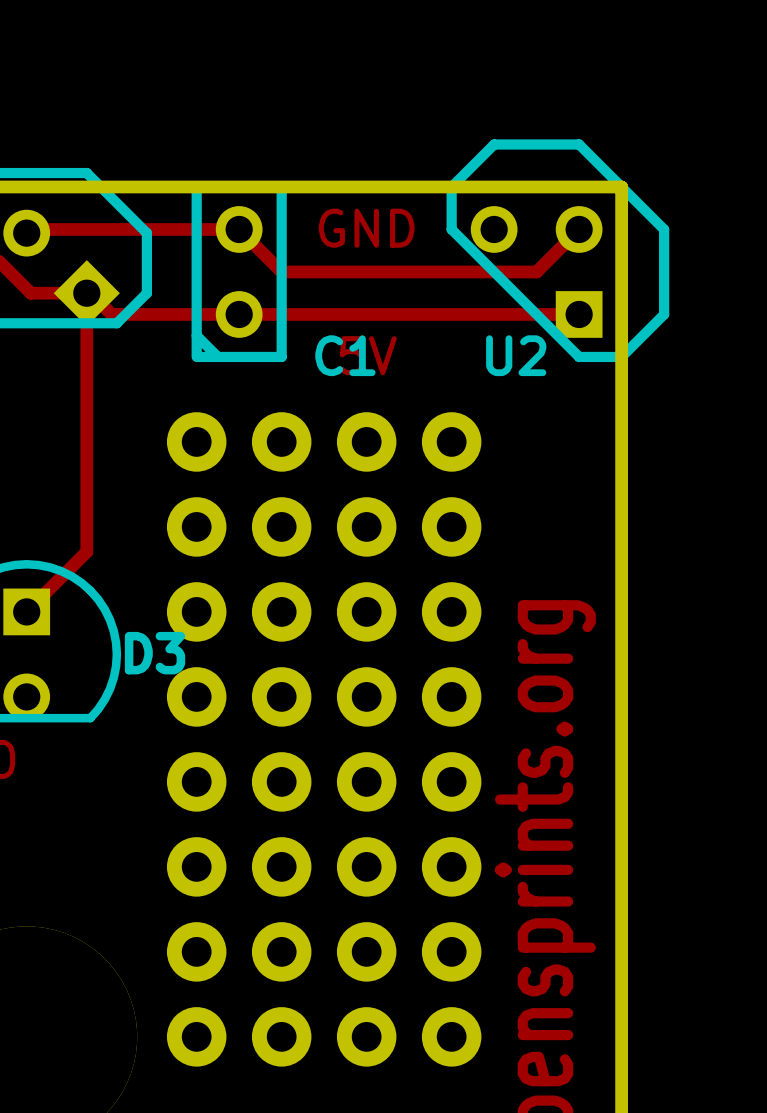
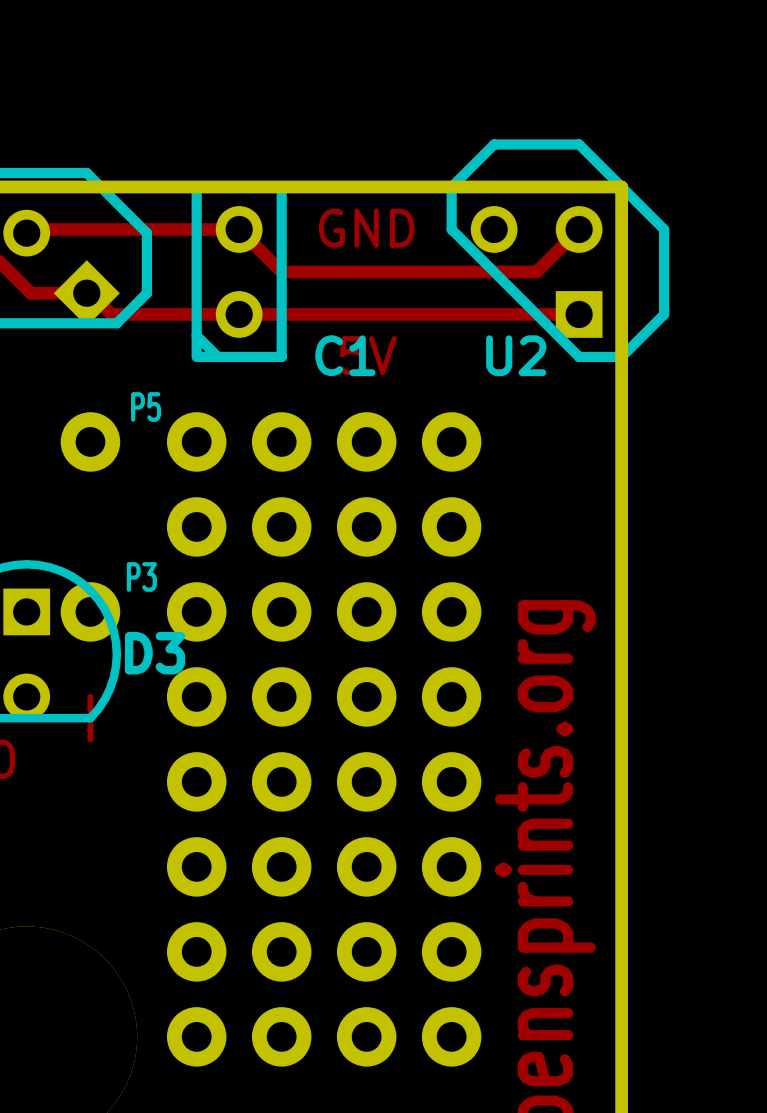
track: (86, 296) (86, 551) (26, 611) -> none
P5: none -> (90, 441)
P3: none -> (90, 611)
track: none -> (90, 696) (90, 739)

